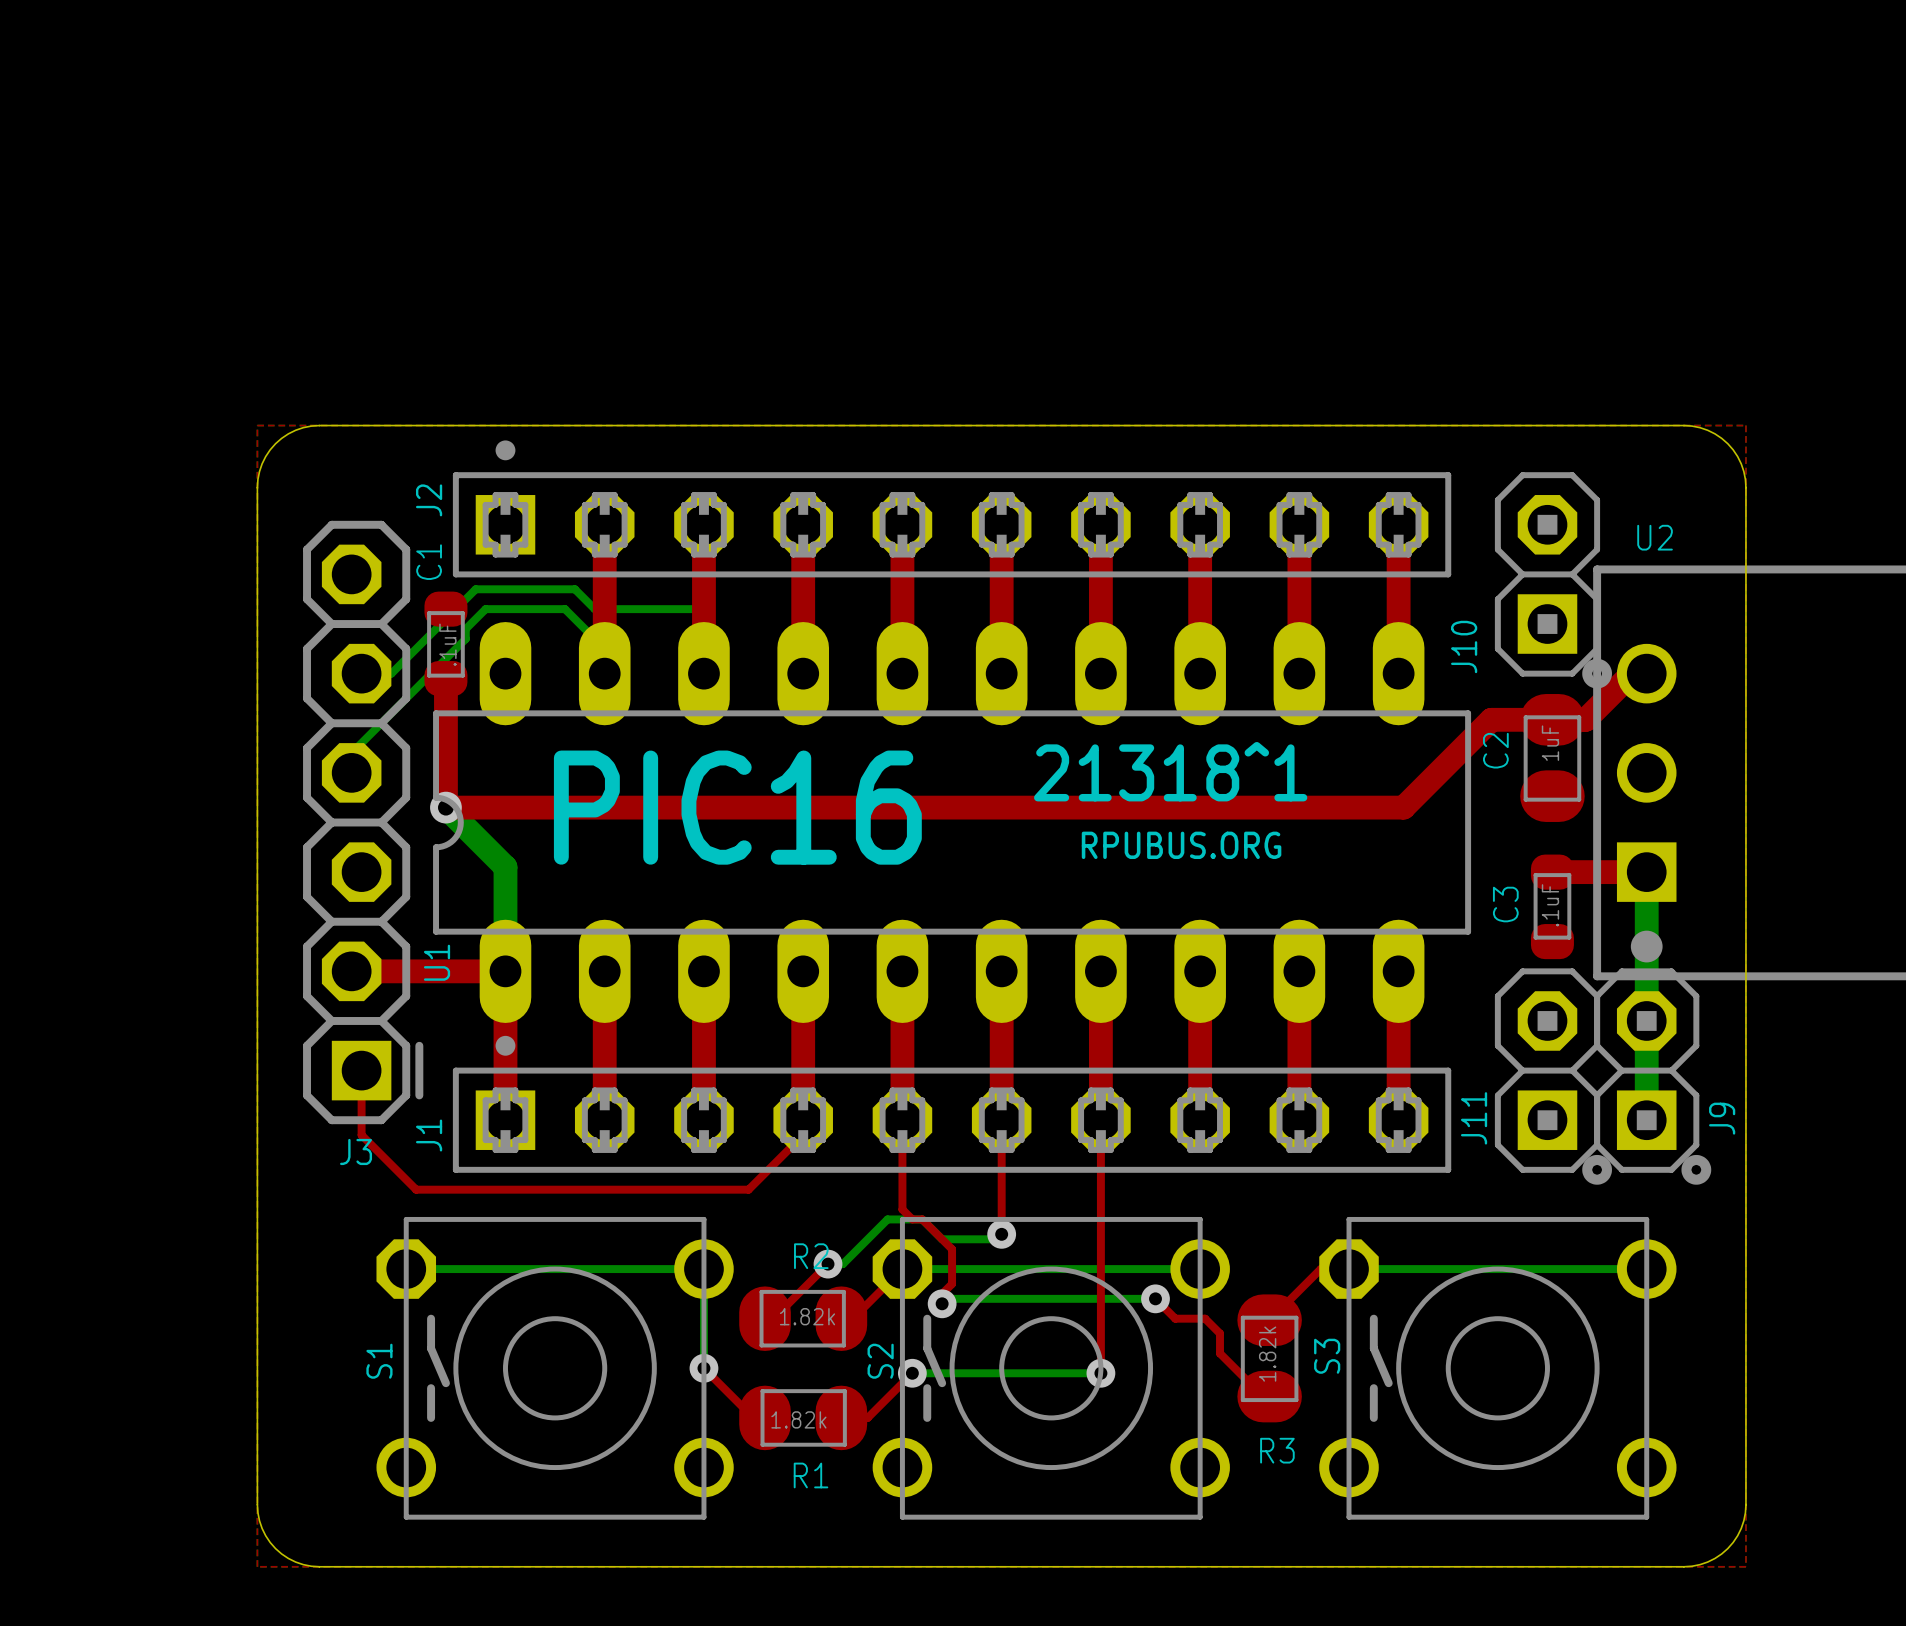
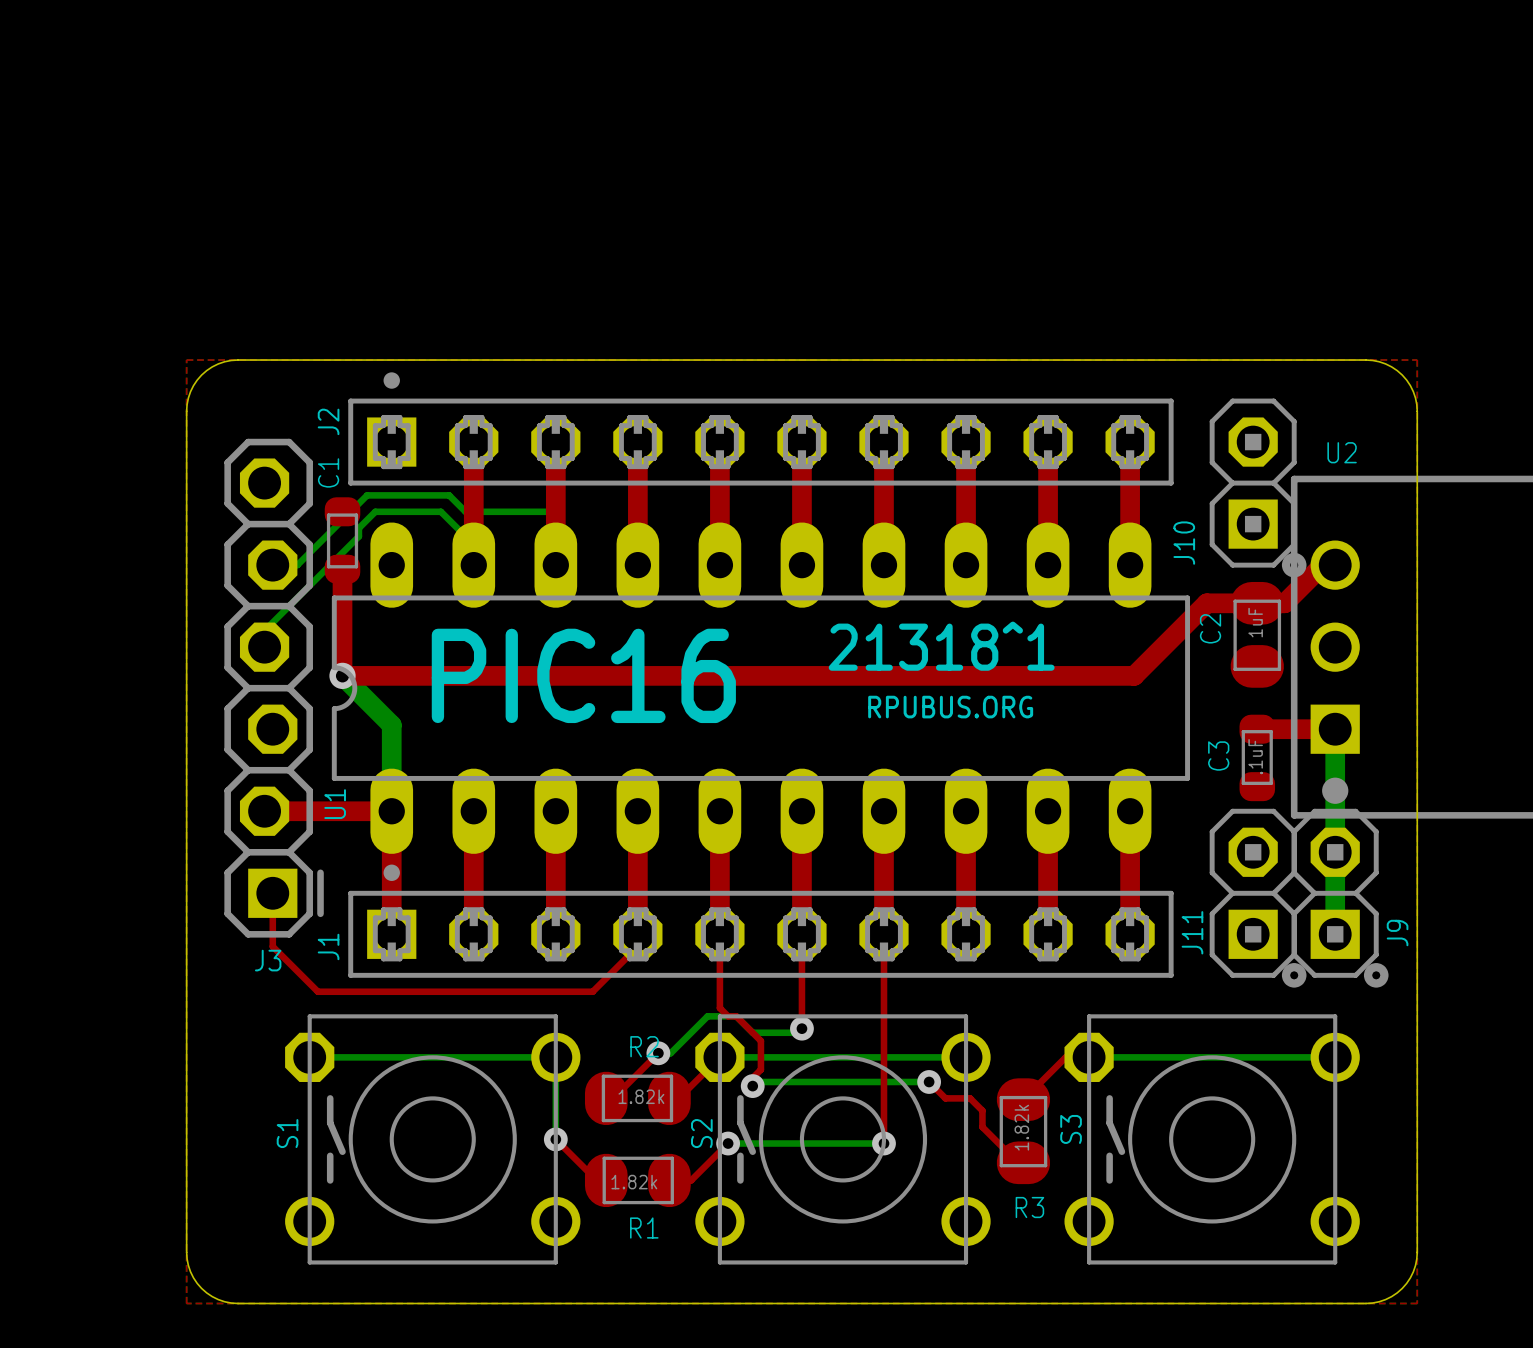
C1 value: .1uF (447, 644) -> none

